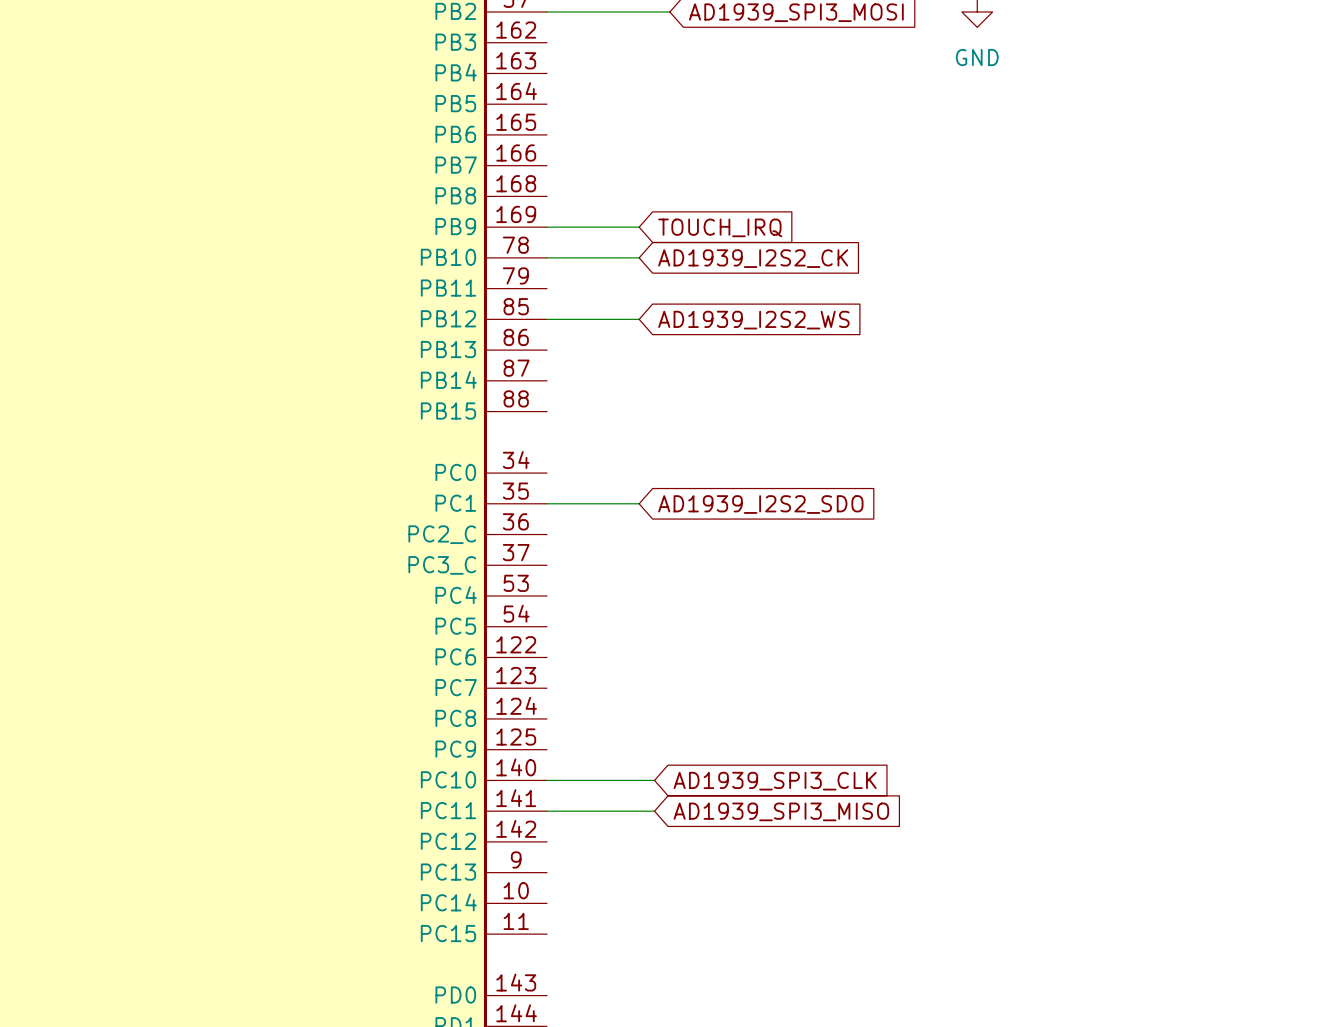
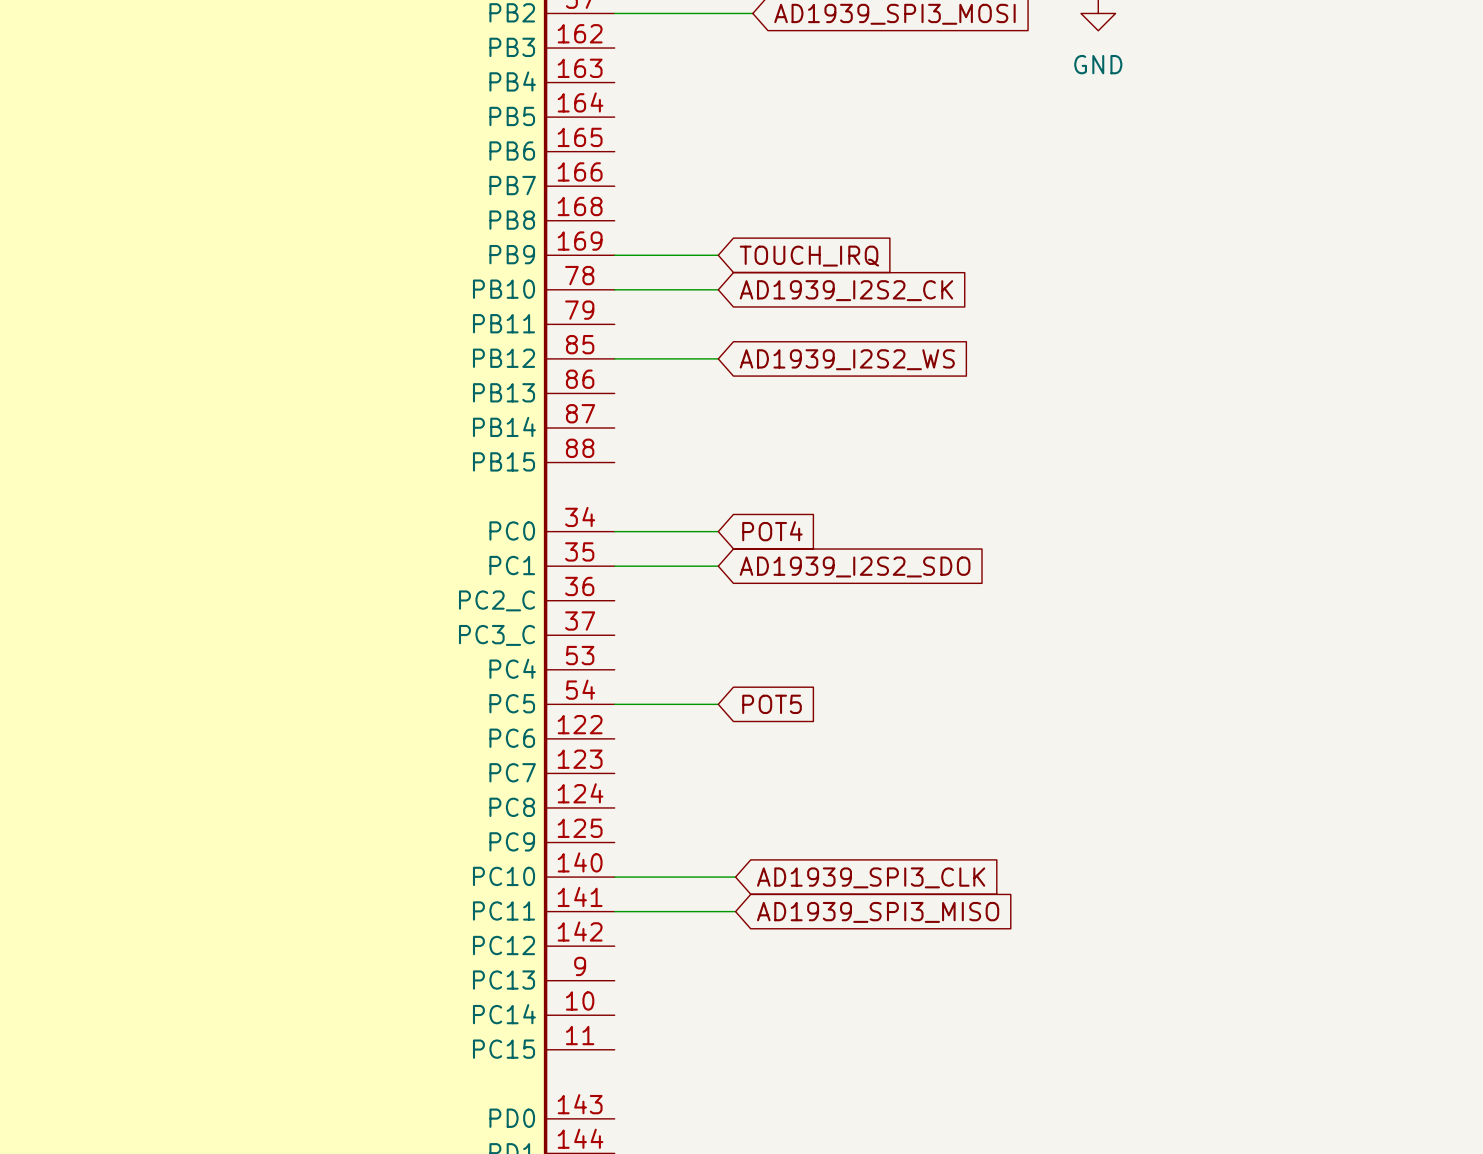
global label: none -> POT4 (772, 531)
wire: none -> (614, 531) (718, 531)
wire: none -> (614, 704) (718, 704)
global label: none -> POT5 (772, 704)

